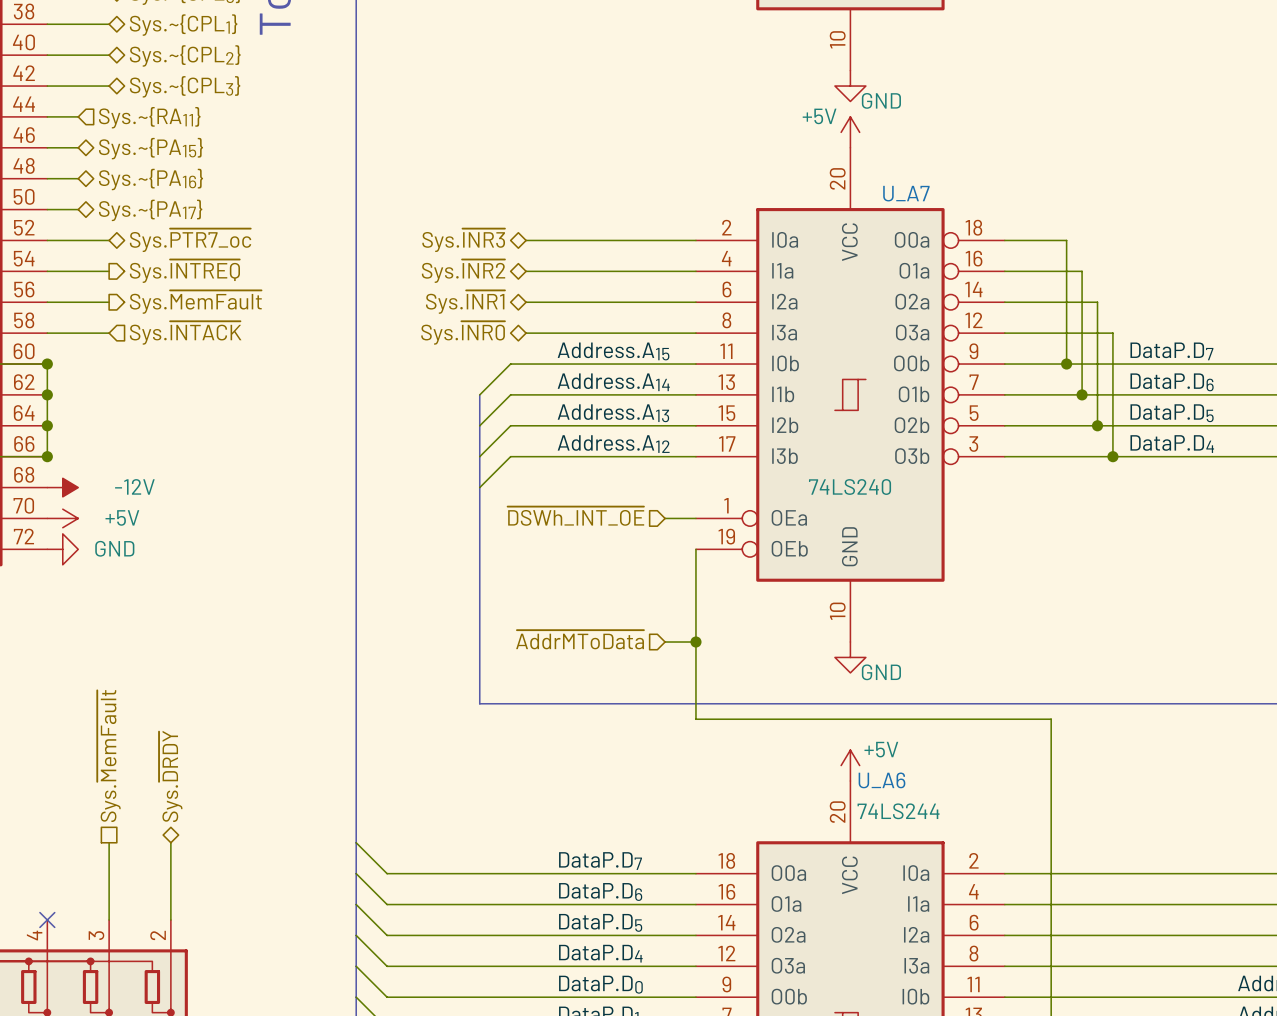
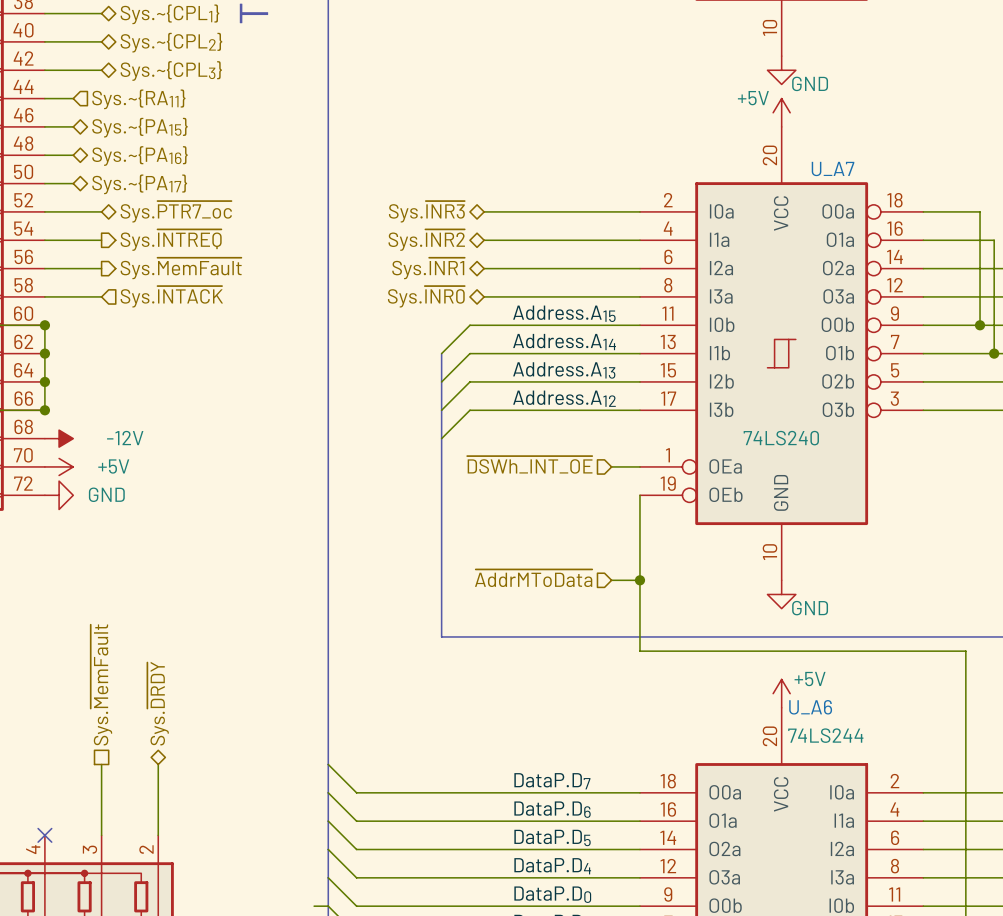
wire: none -> (314, 906) (328, 906)

